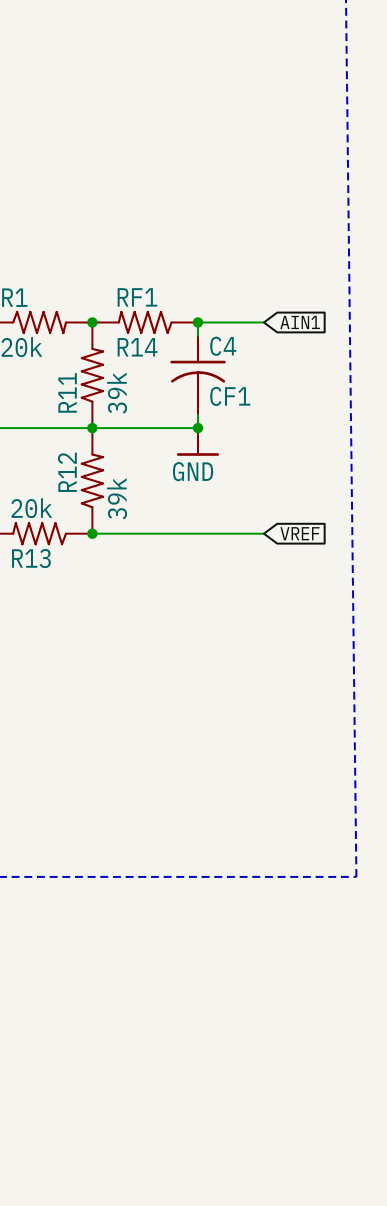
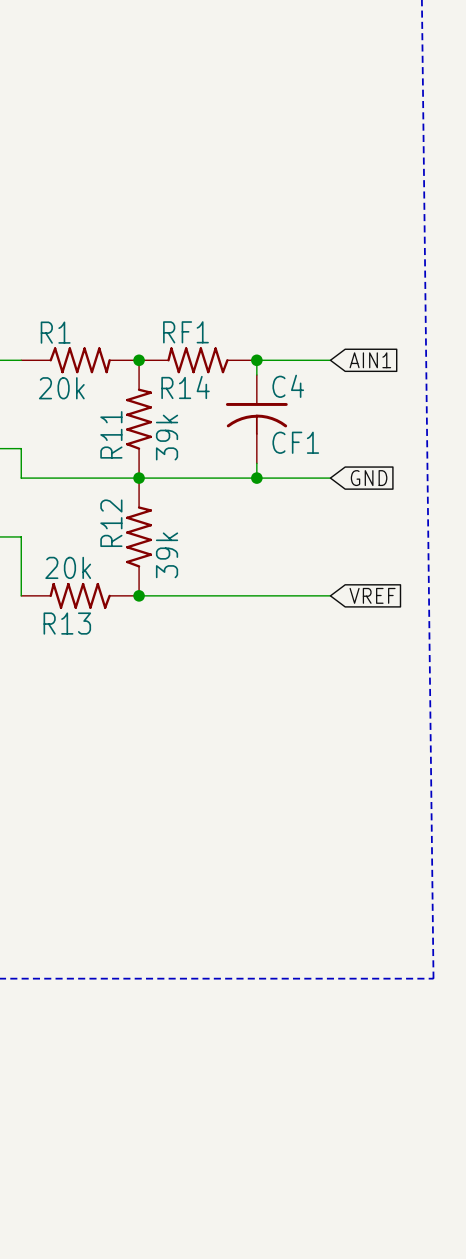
wire: none -> (256, 478) (330, 478)
global label: none -> GND (369, 478)
power symbol: GND (198, 441) -> none

